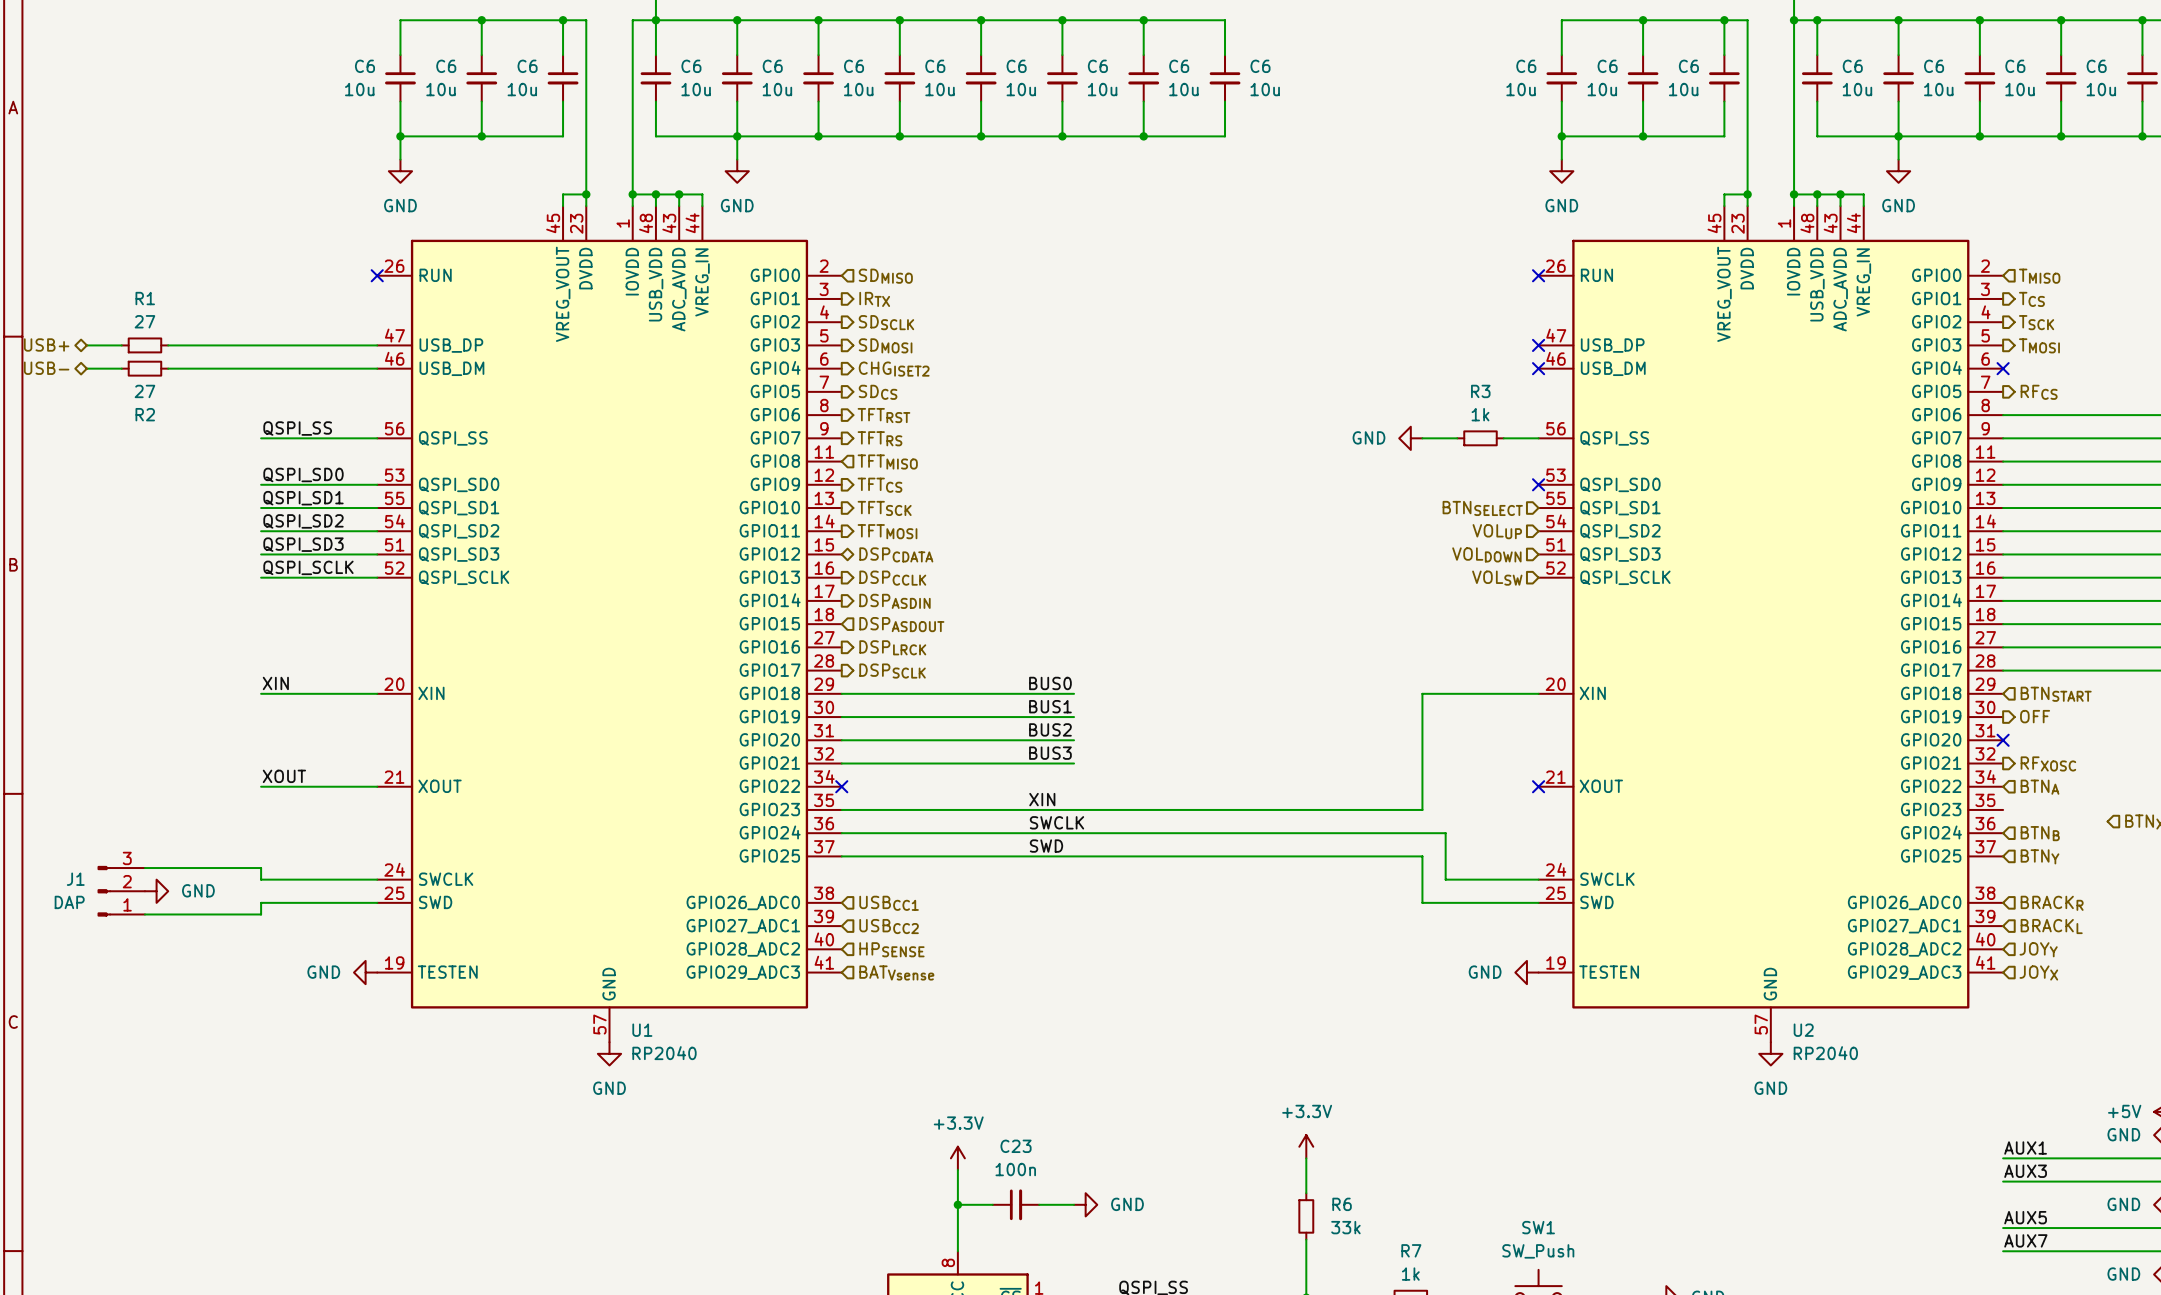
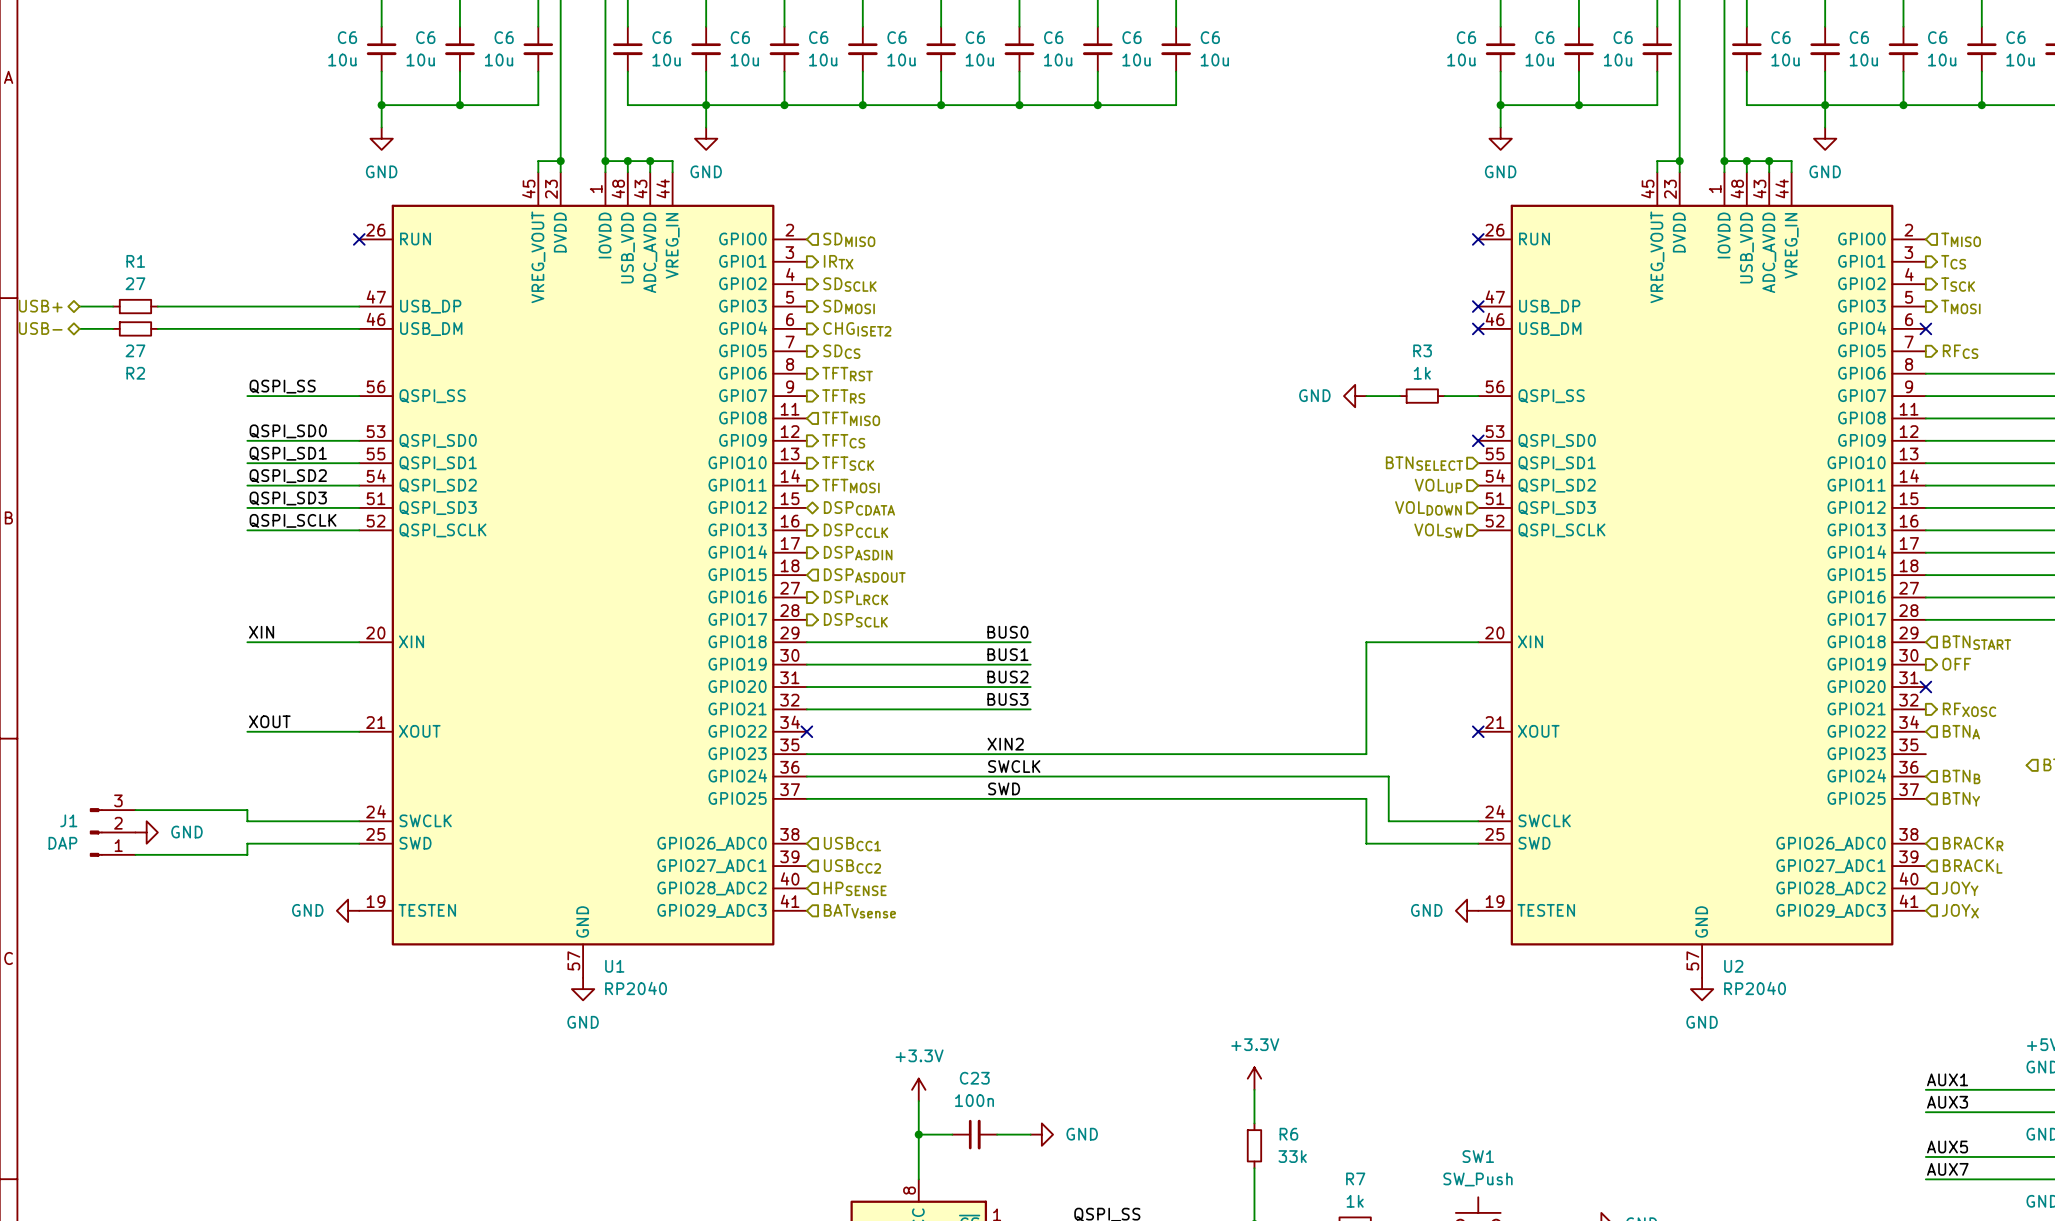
label: XIN (1042, 799) -> XIN2 (1005, 744)

